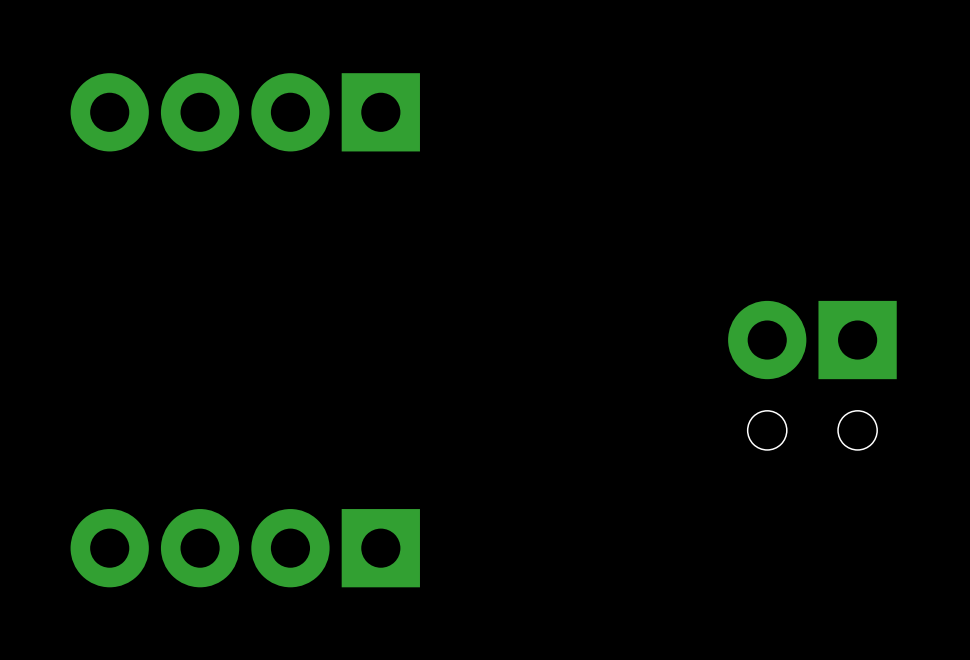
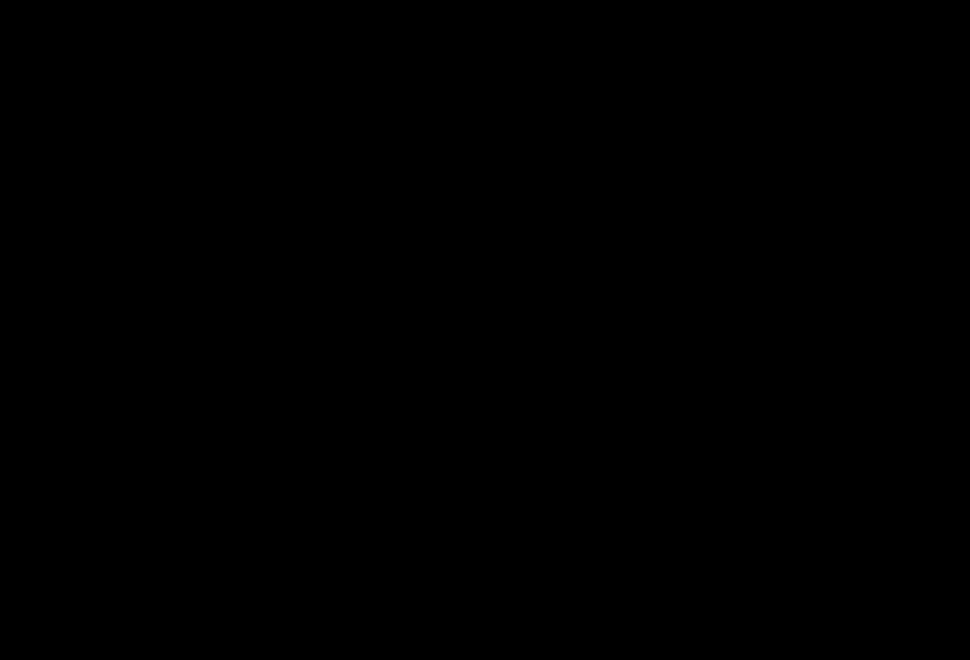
part: (245, 112) -> none
part: (812, 375) -> none
part: (245, 548) -> none

